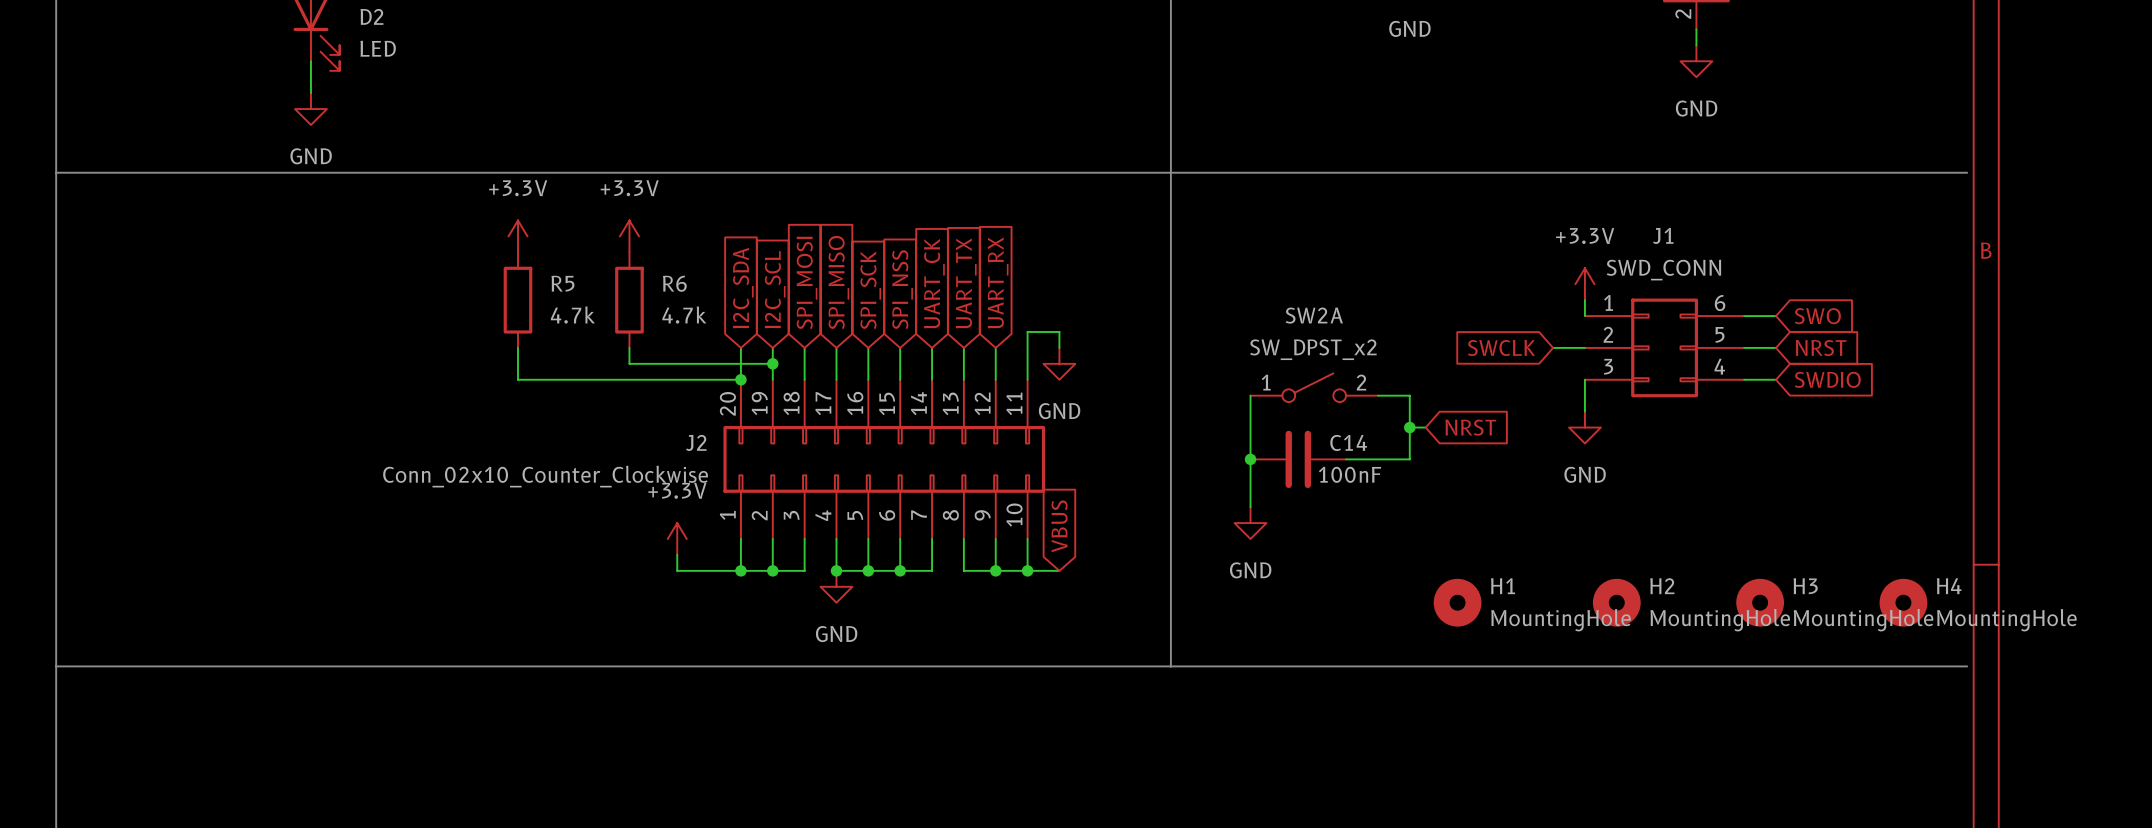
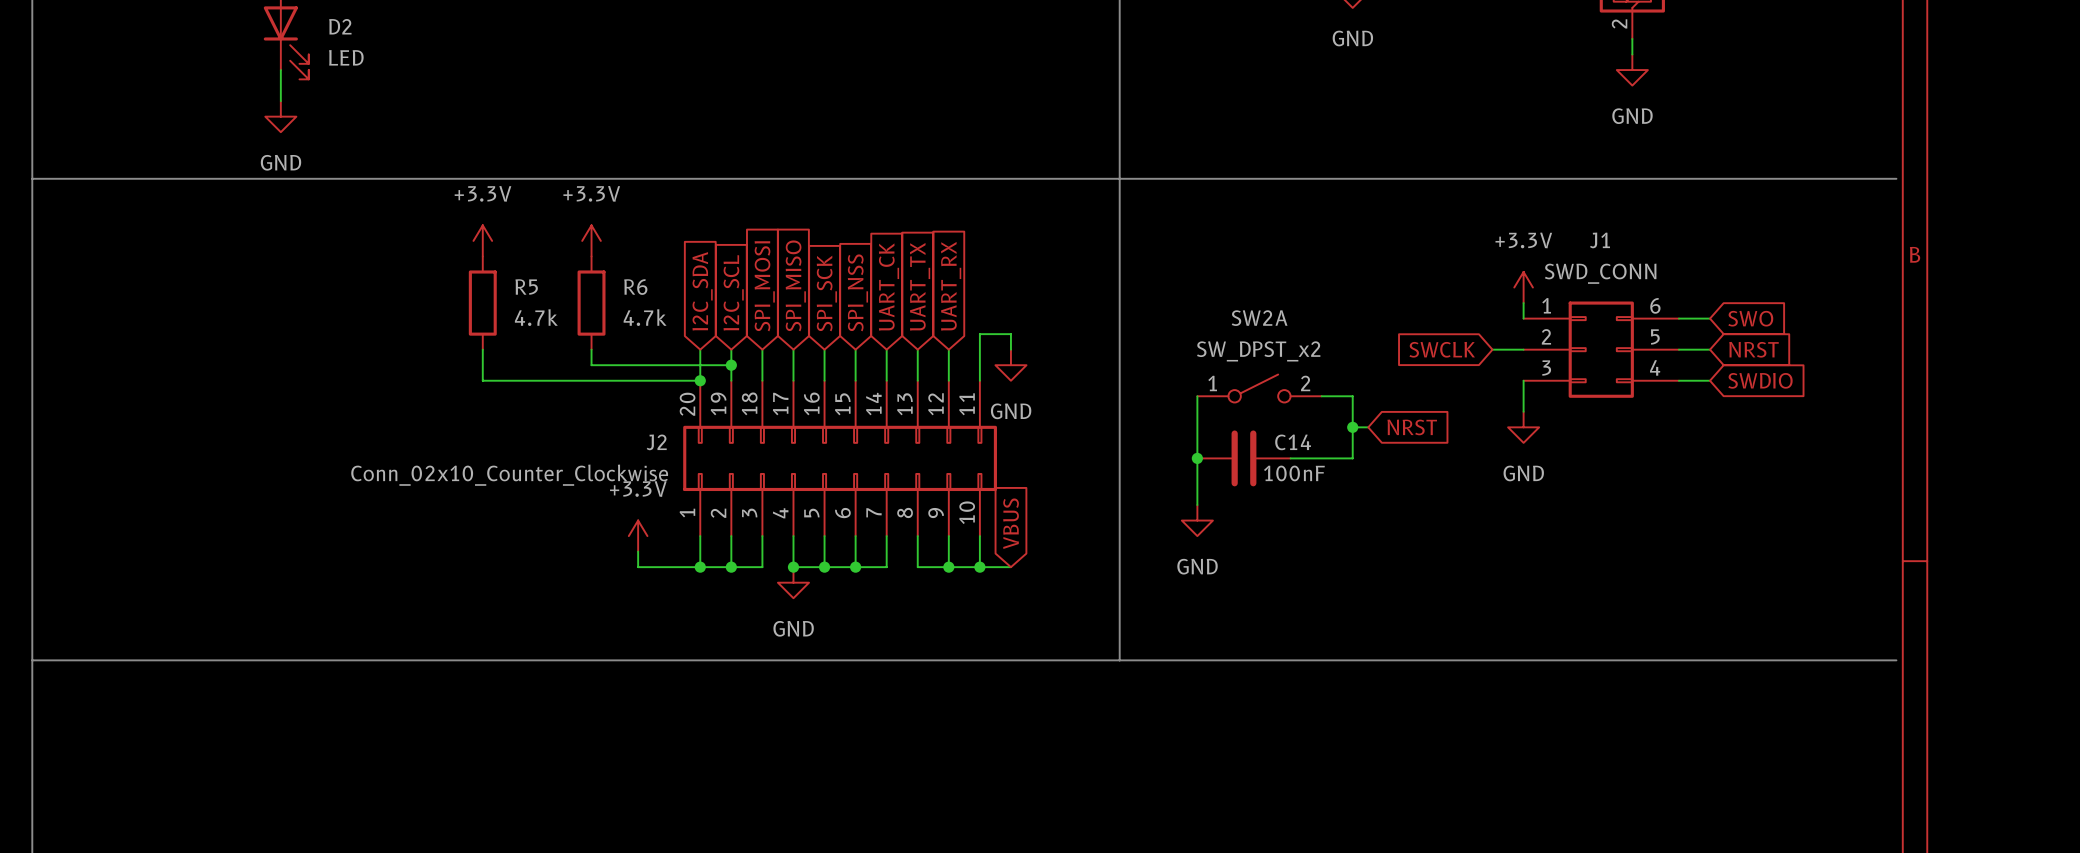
H1: MountingHole (1457, 602) -> none
H2: MountingHole (1616, 602) -> none
H3: MountingHole (1760, 602) -> none
H4: MountingHole (1903, 602) -> none

